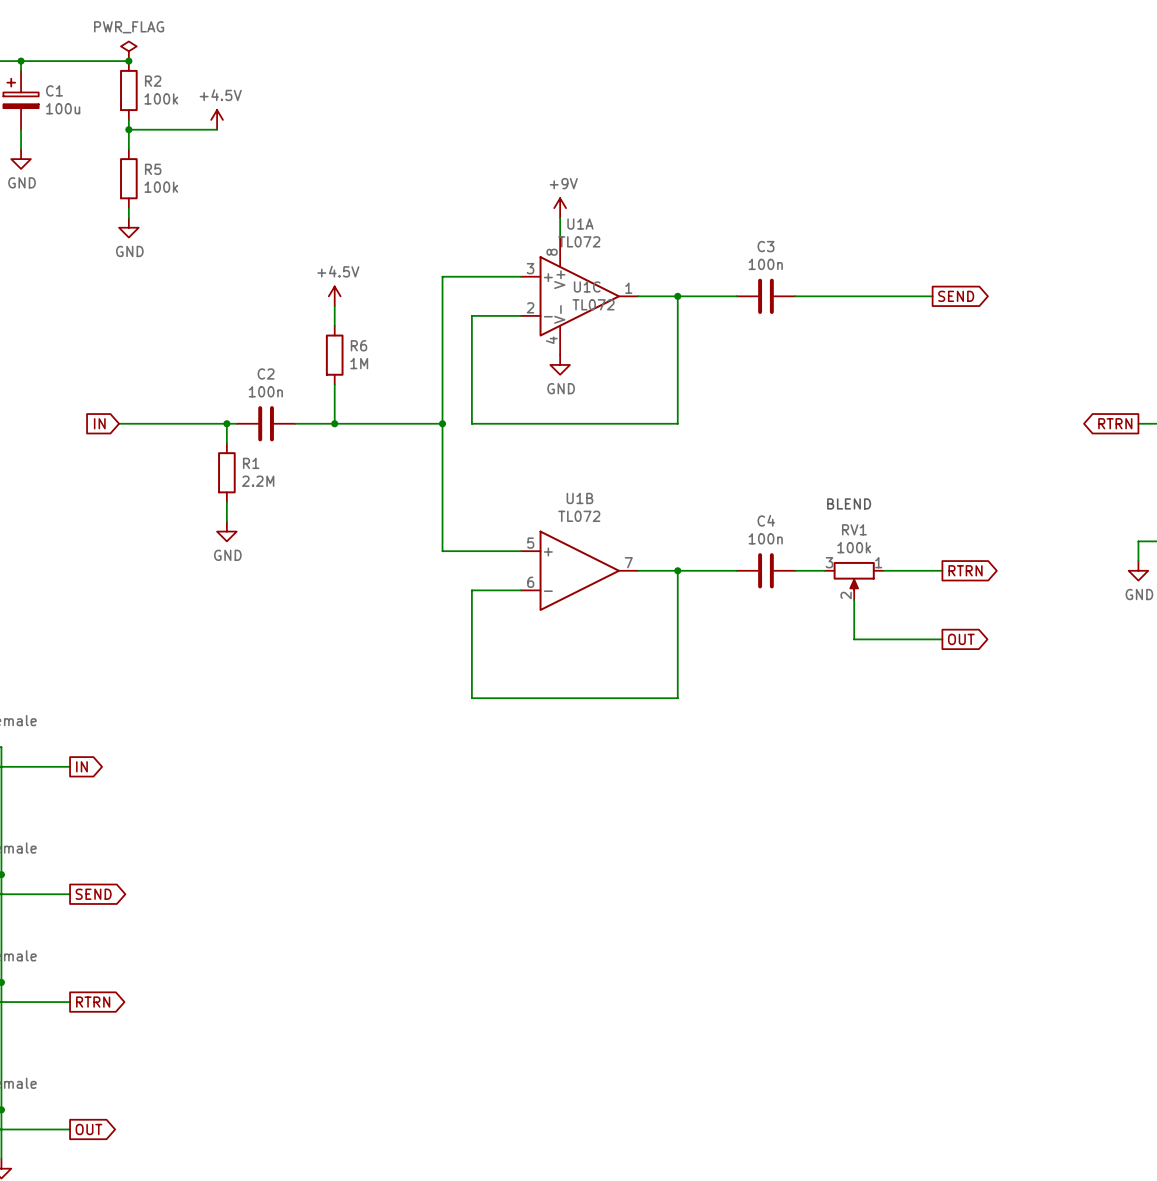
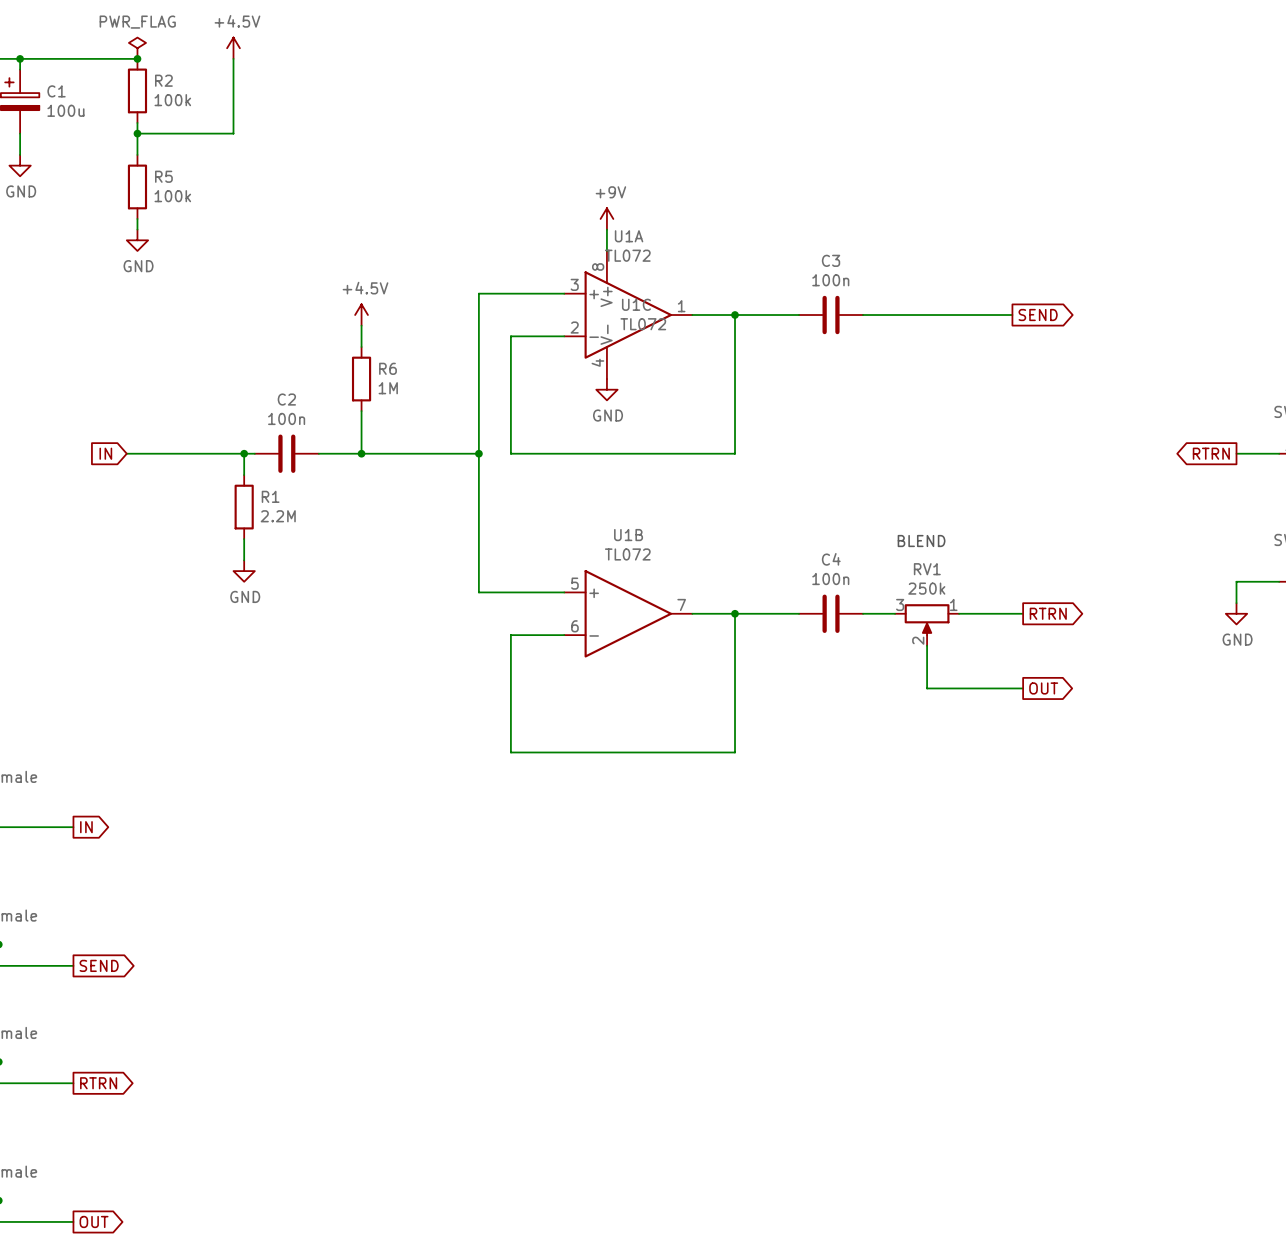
wire: none -> (233, 58) (233, 133)
power symbol position: +4.5V (217, 119) -> +4.5V (233, 48)
RV1 value: 100k (854, 547) -> 250k (926, 588)

